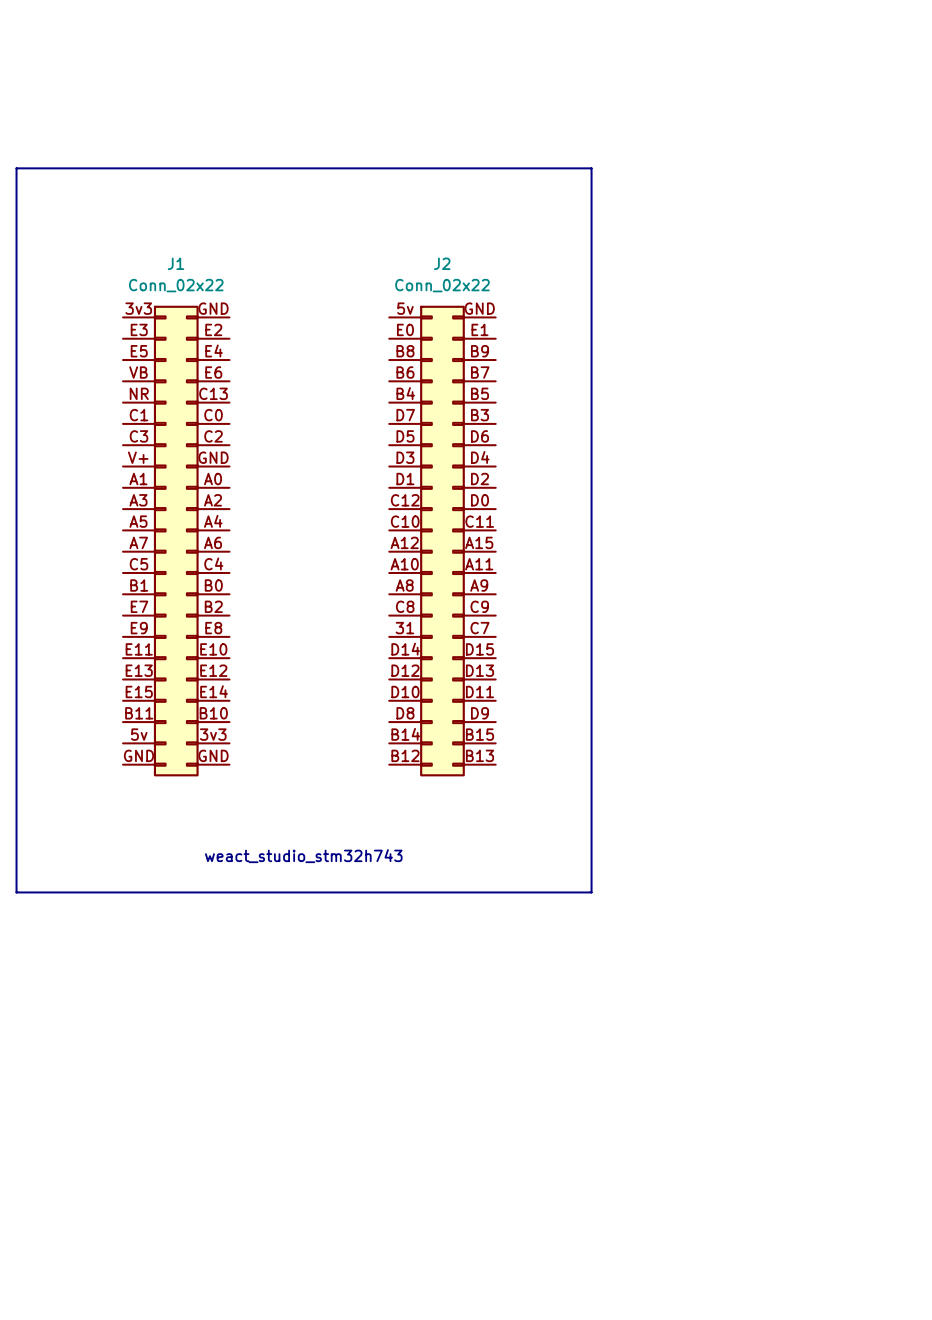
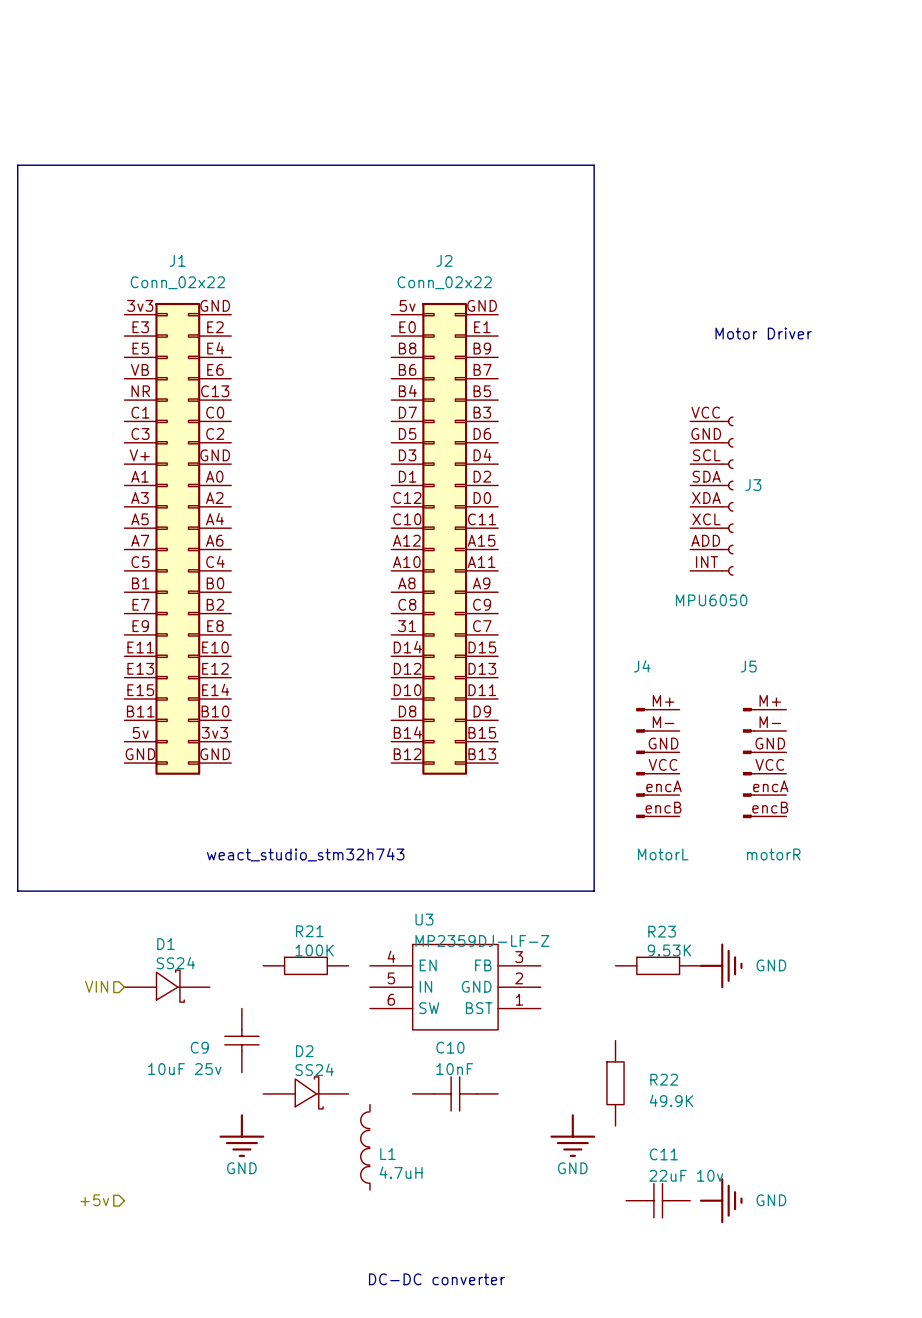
text: none -> Motor Driver (763, 333)
J3: none -> MPU6050 (711, 496)
J4: none -> MotorL (657, 763)
J5: none -> motorR (764, 763)
R21: none -> 100K (305, 965)
R23: none -> 9.53K (658, 965)
power symbol: none -> GND (721, 965)
hierarchical label: none -> VIN (96, 986)
D1: none -> SS24 (167, 986)
U3: none -> MP2359DJ-LF-Z (455, 987)
C9: none -> 10uF 25v (241, 1040)
R22: none -> 49.9K (615, 1083)
D2: none -> SS24 (305, 1092)
C10: none -> 10nF (455, 1093)
power symbol: none -> GND (241, 1135)
power symbol: none -> GND (572, 1135)
L1: none -> 4.7uH (365, 1147)
hierarchical label: none -> +5v (94, 1200)
C11: none -> 22uF 10v (658, 1200)
power symbol: none -> GND (721, 1200)
text: none -> DC-DC converter (436, 1279)

